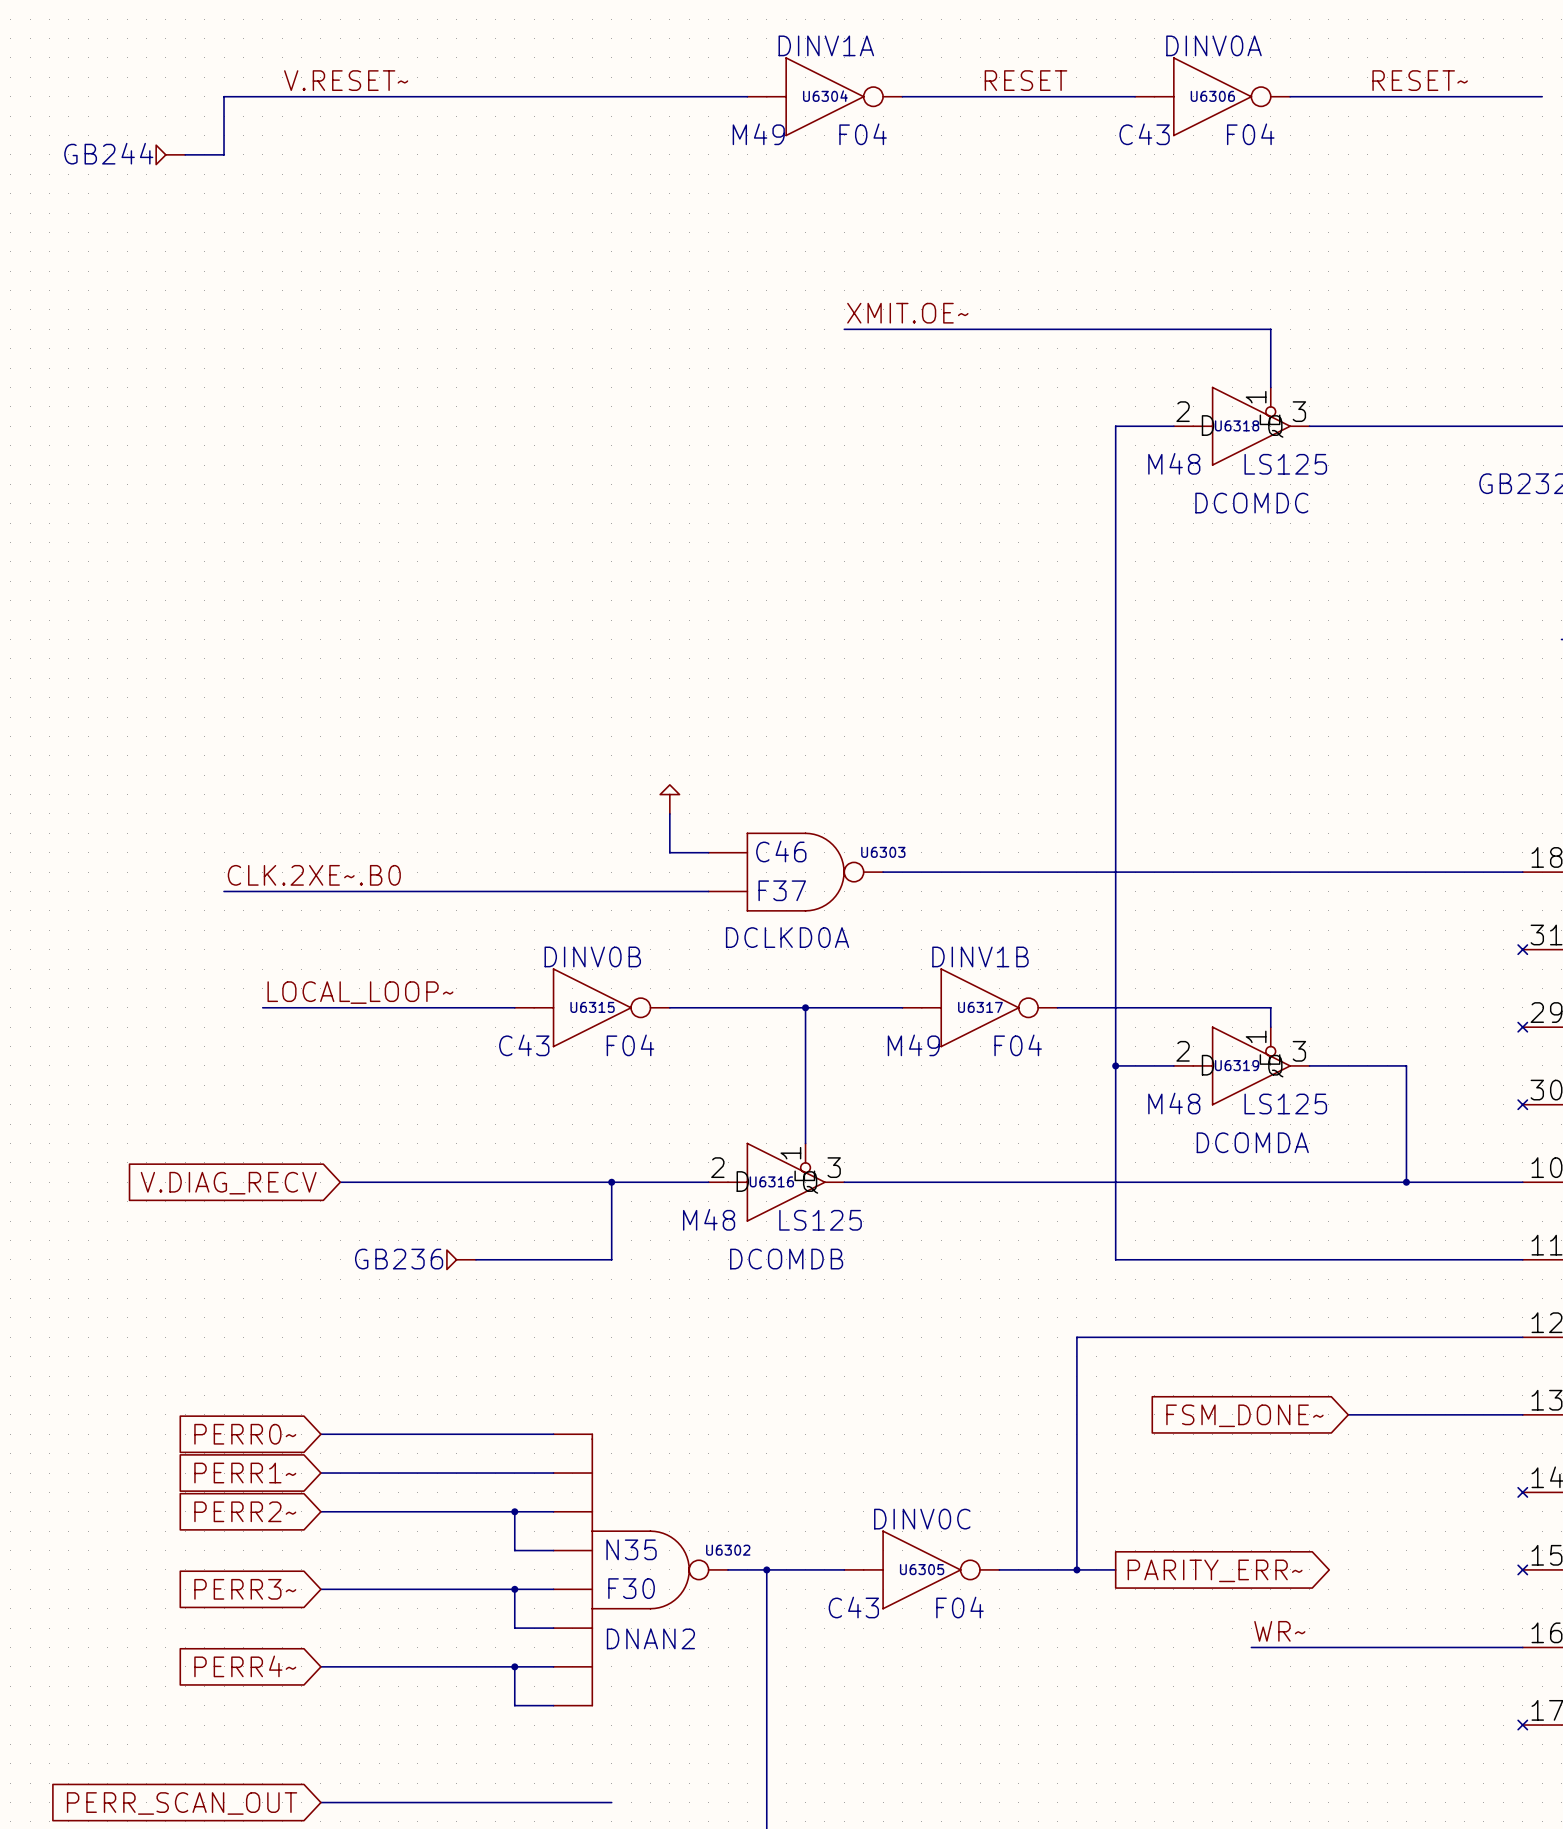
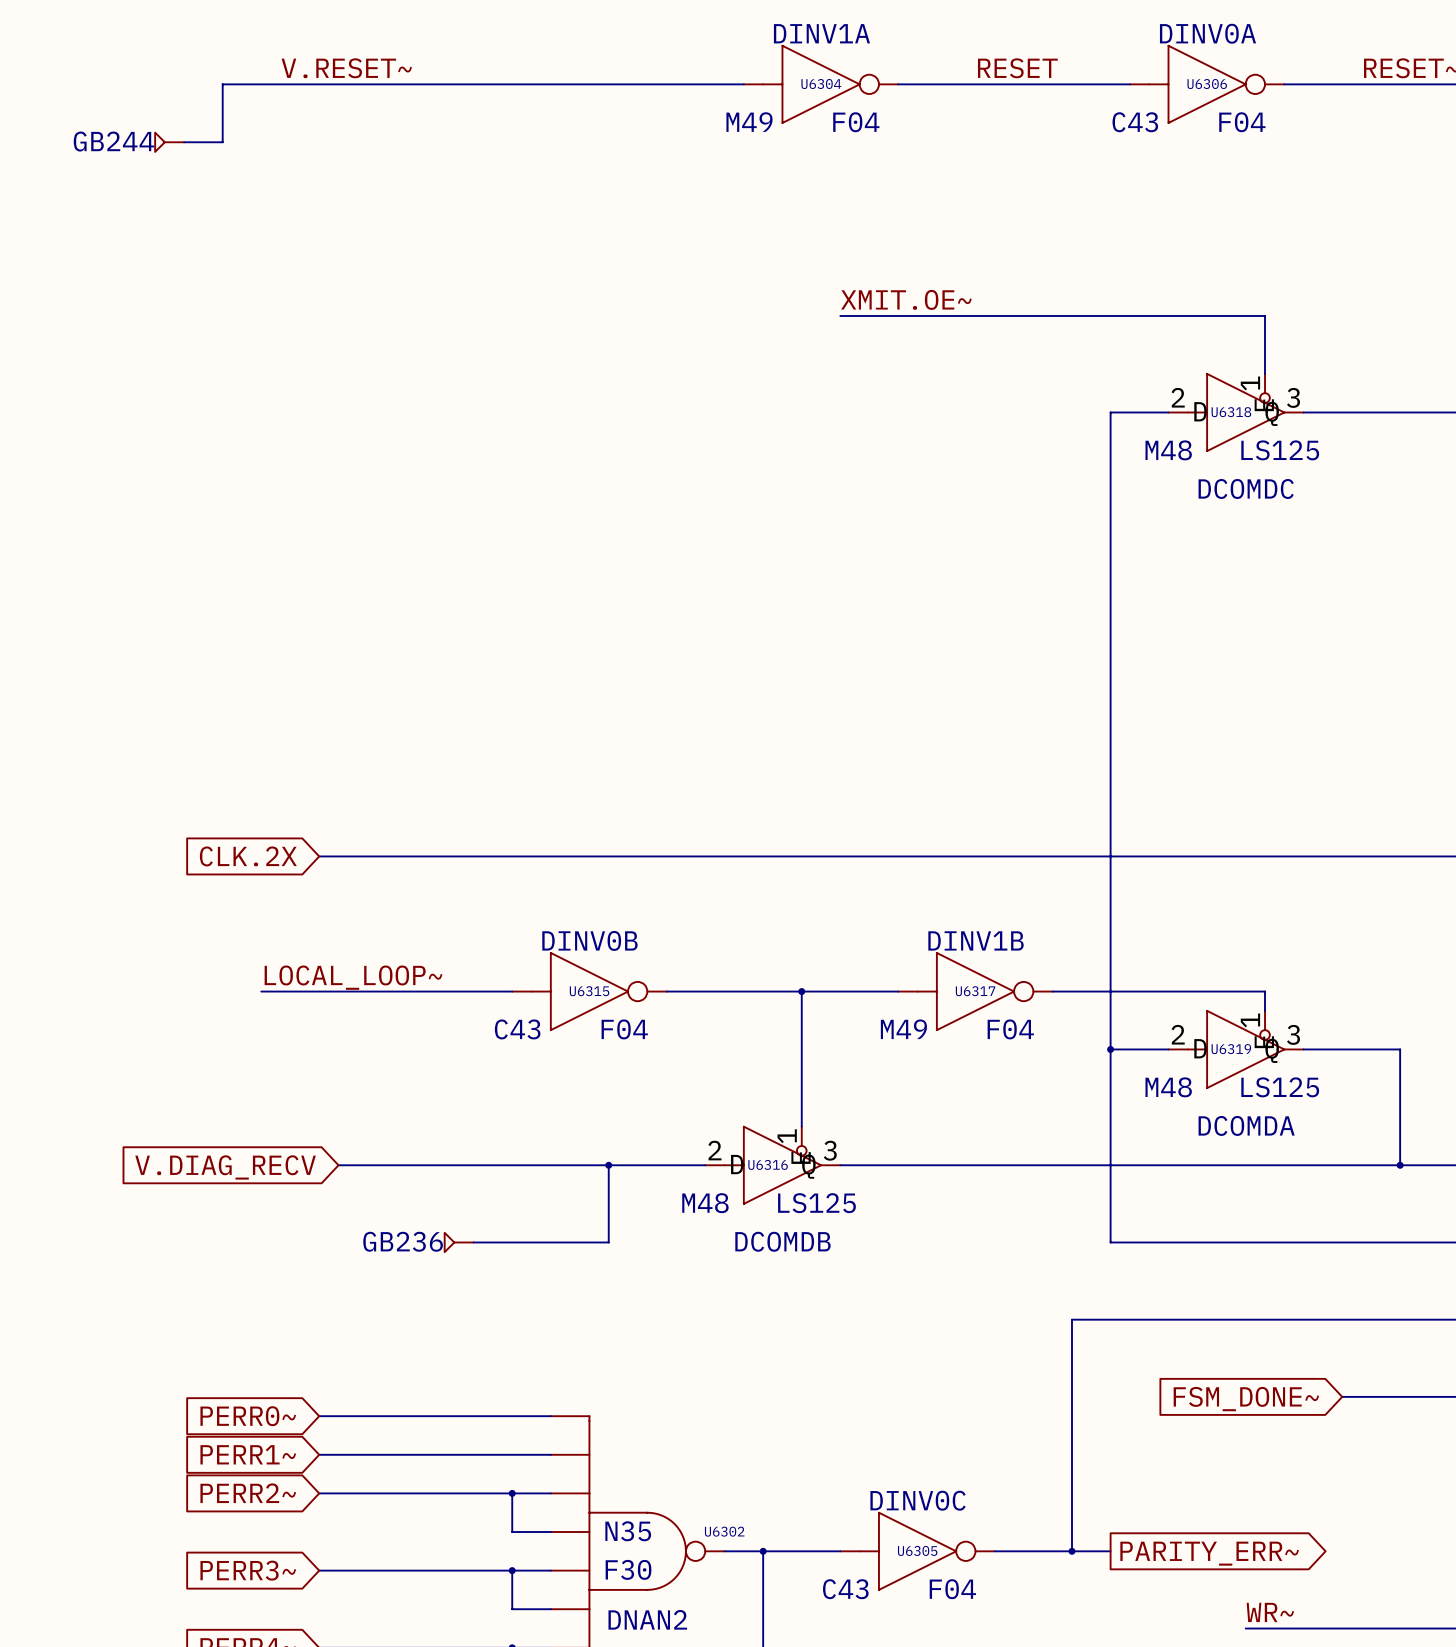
power symbol: (669, 799) -> none
wire: (669, 813) (669, 852) (708, 852) -> none
global label: none -> CLK.2X (248, 856)
wire: none -> (319, 856) (878, 856)
U6303: F37 (795, 872) -> none
label: CLK.2XE~.B0 (314, 875) -> none
wire: (224, 891) (708, 891) -> none

